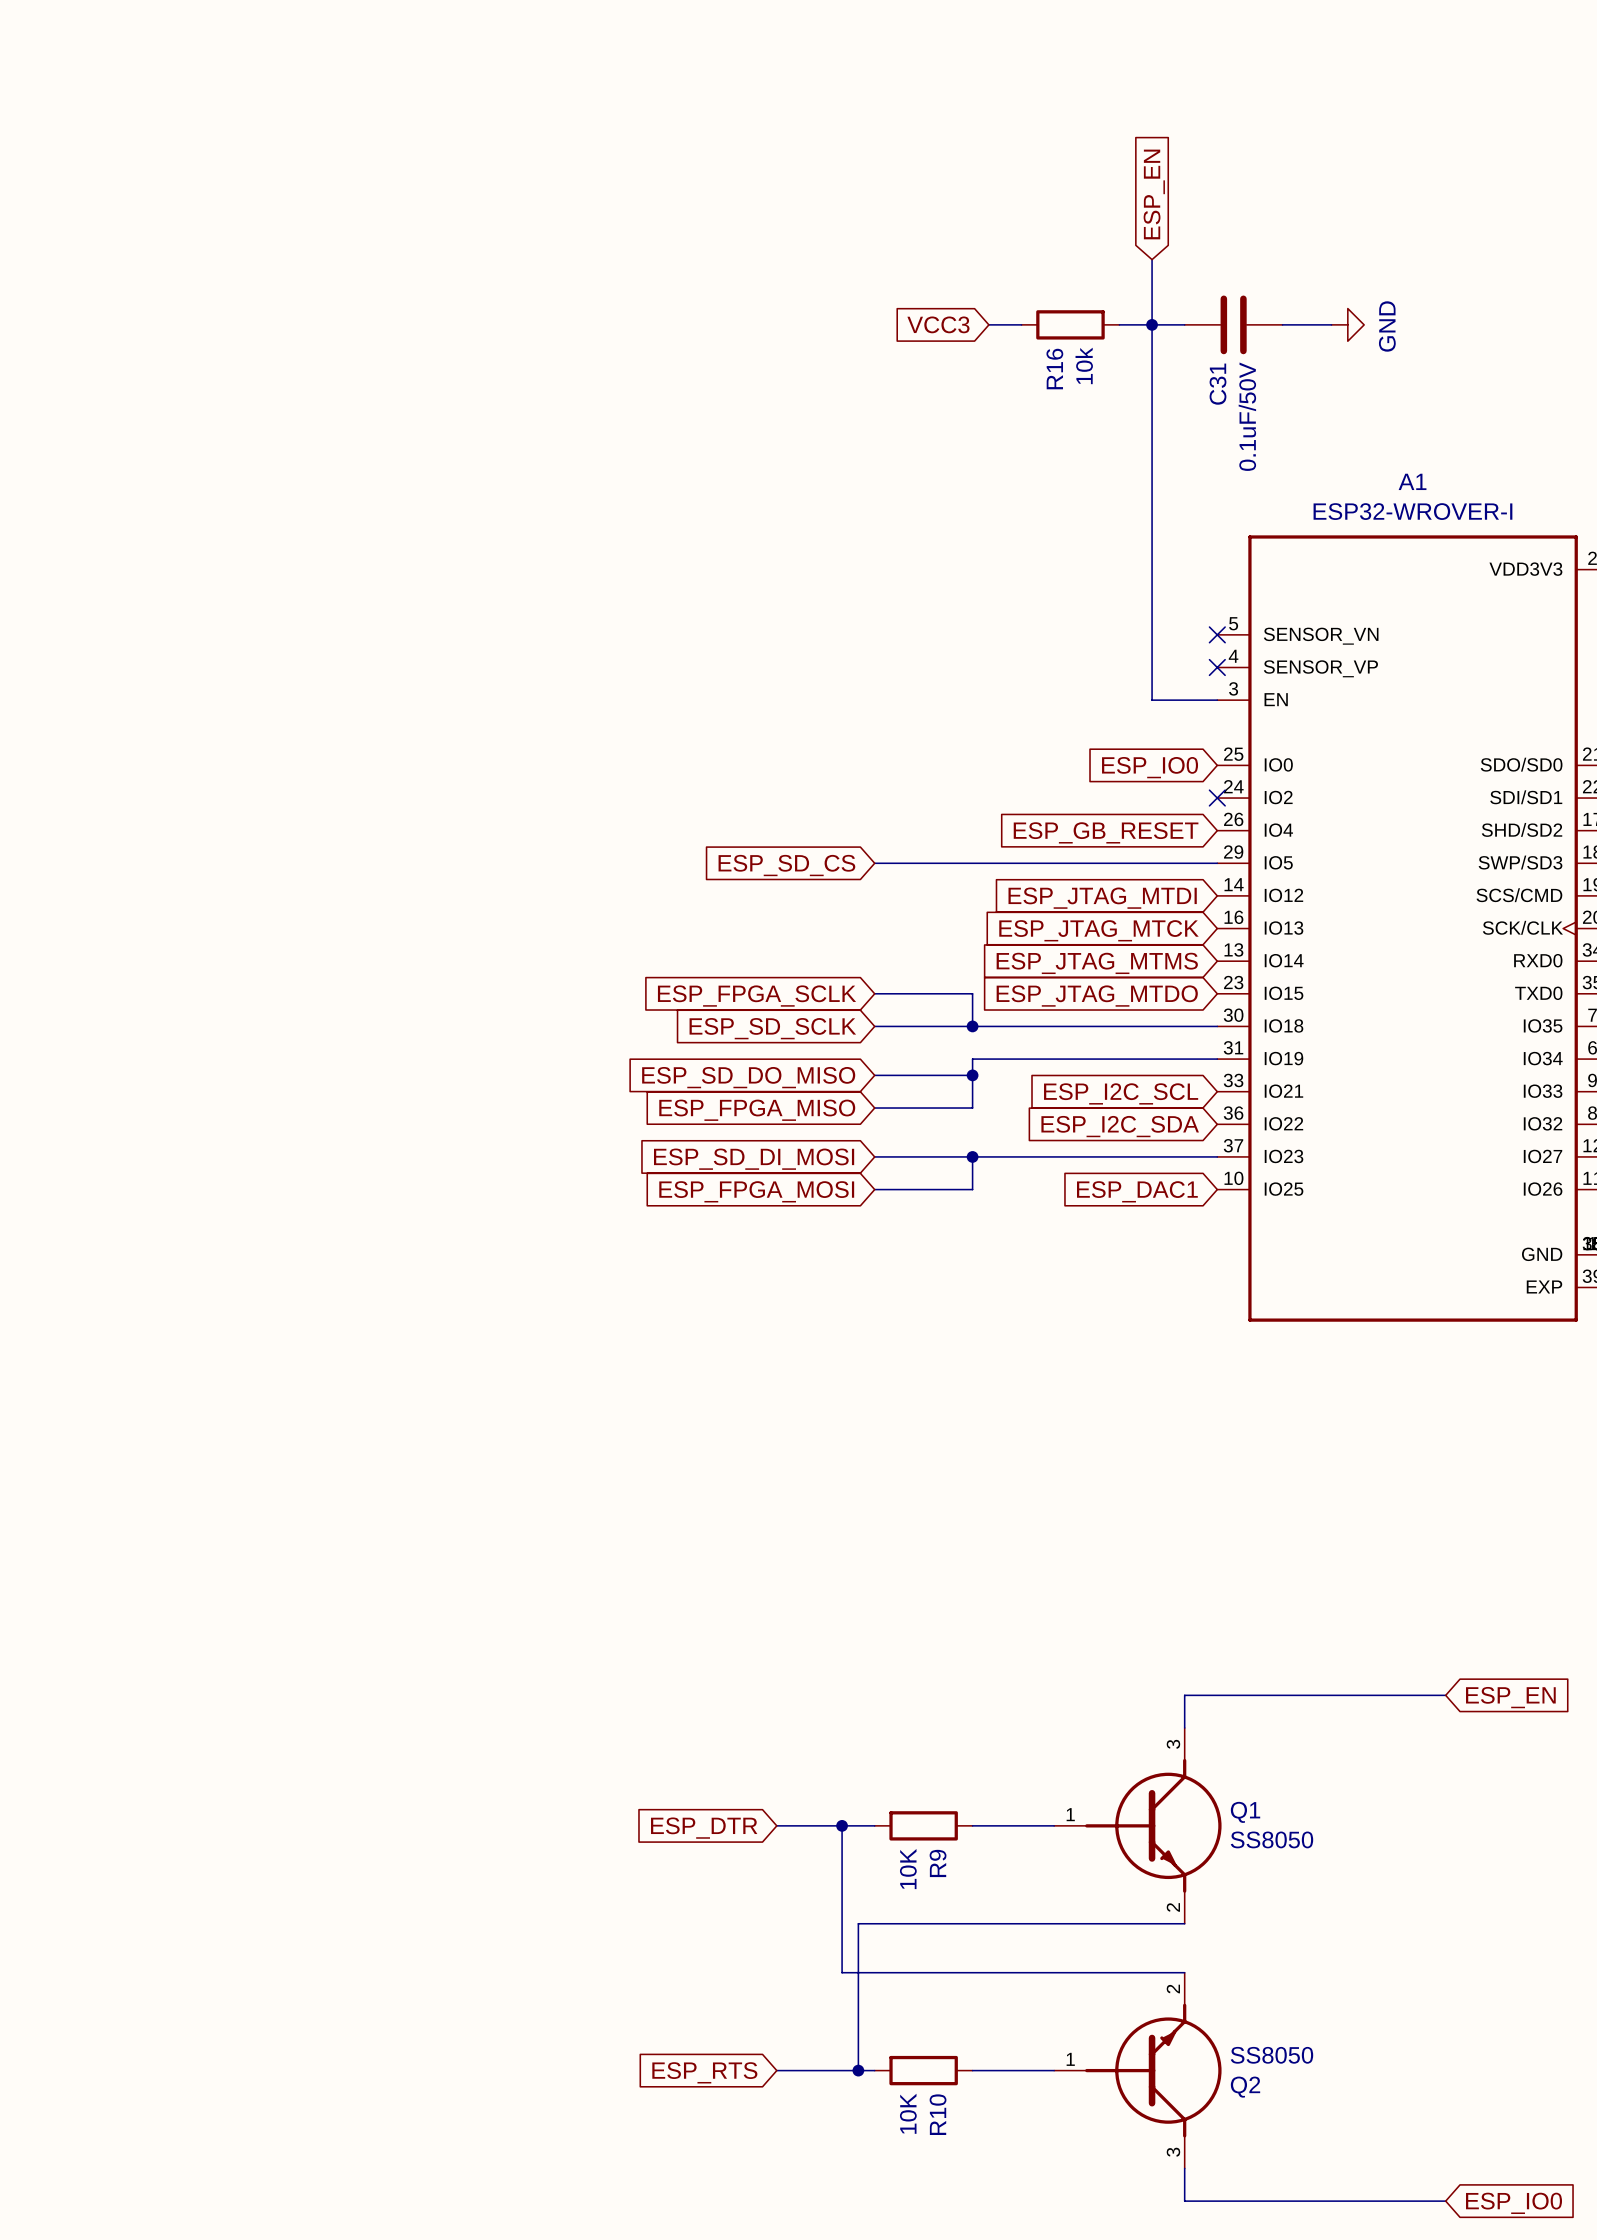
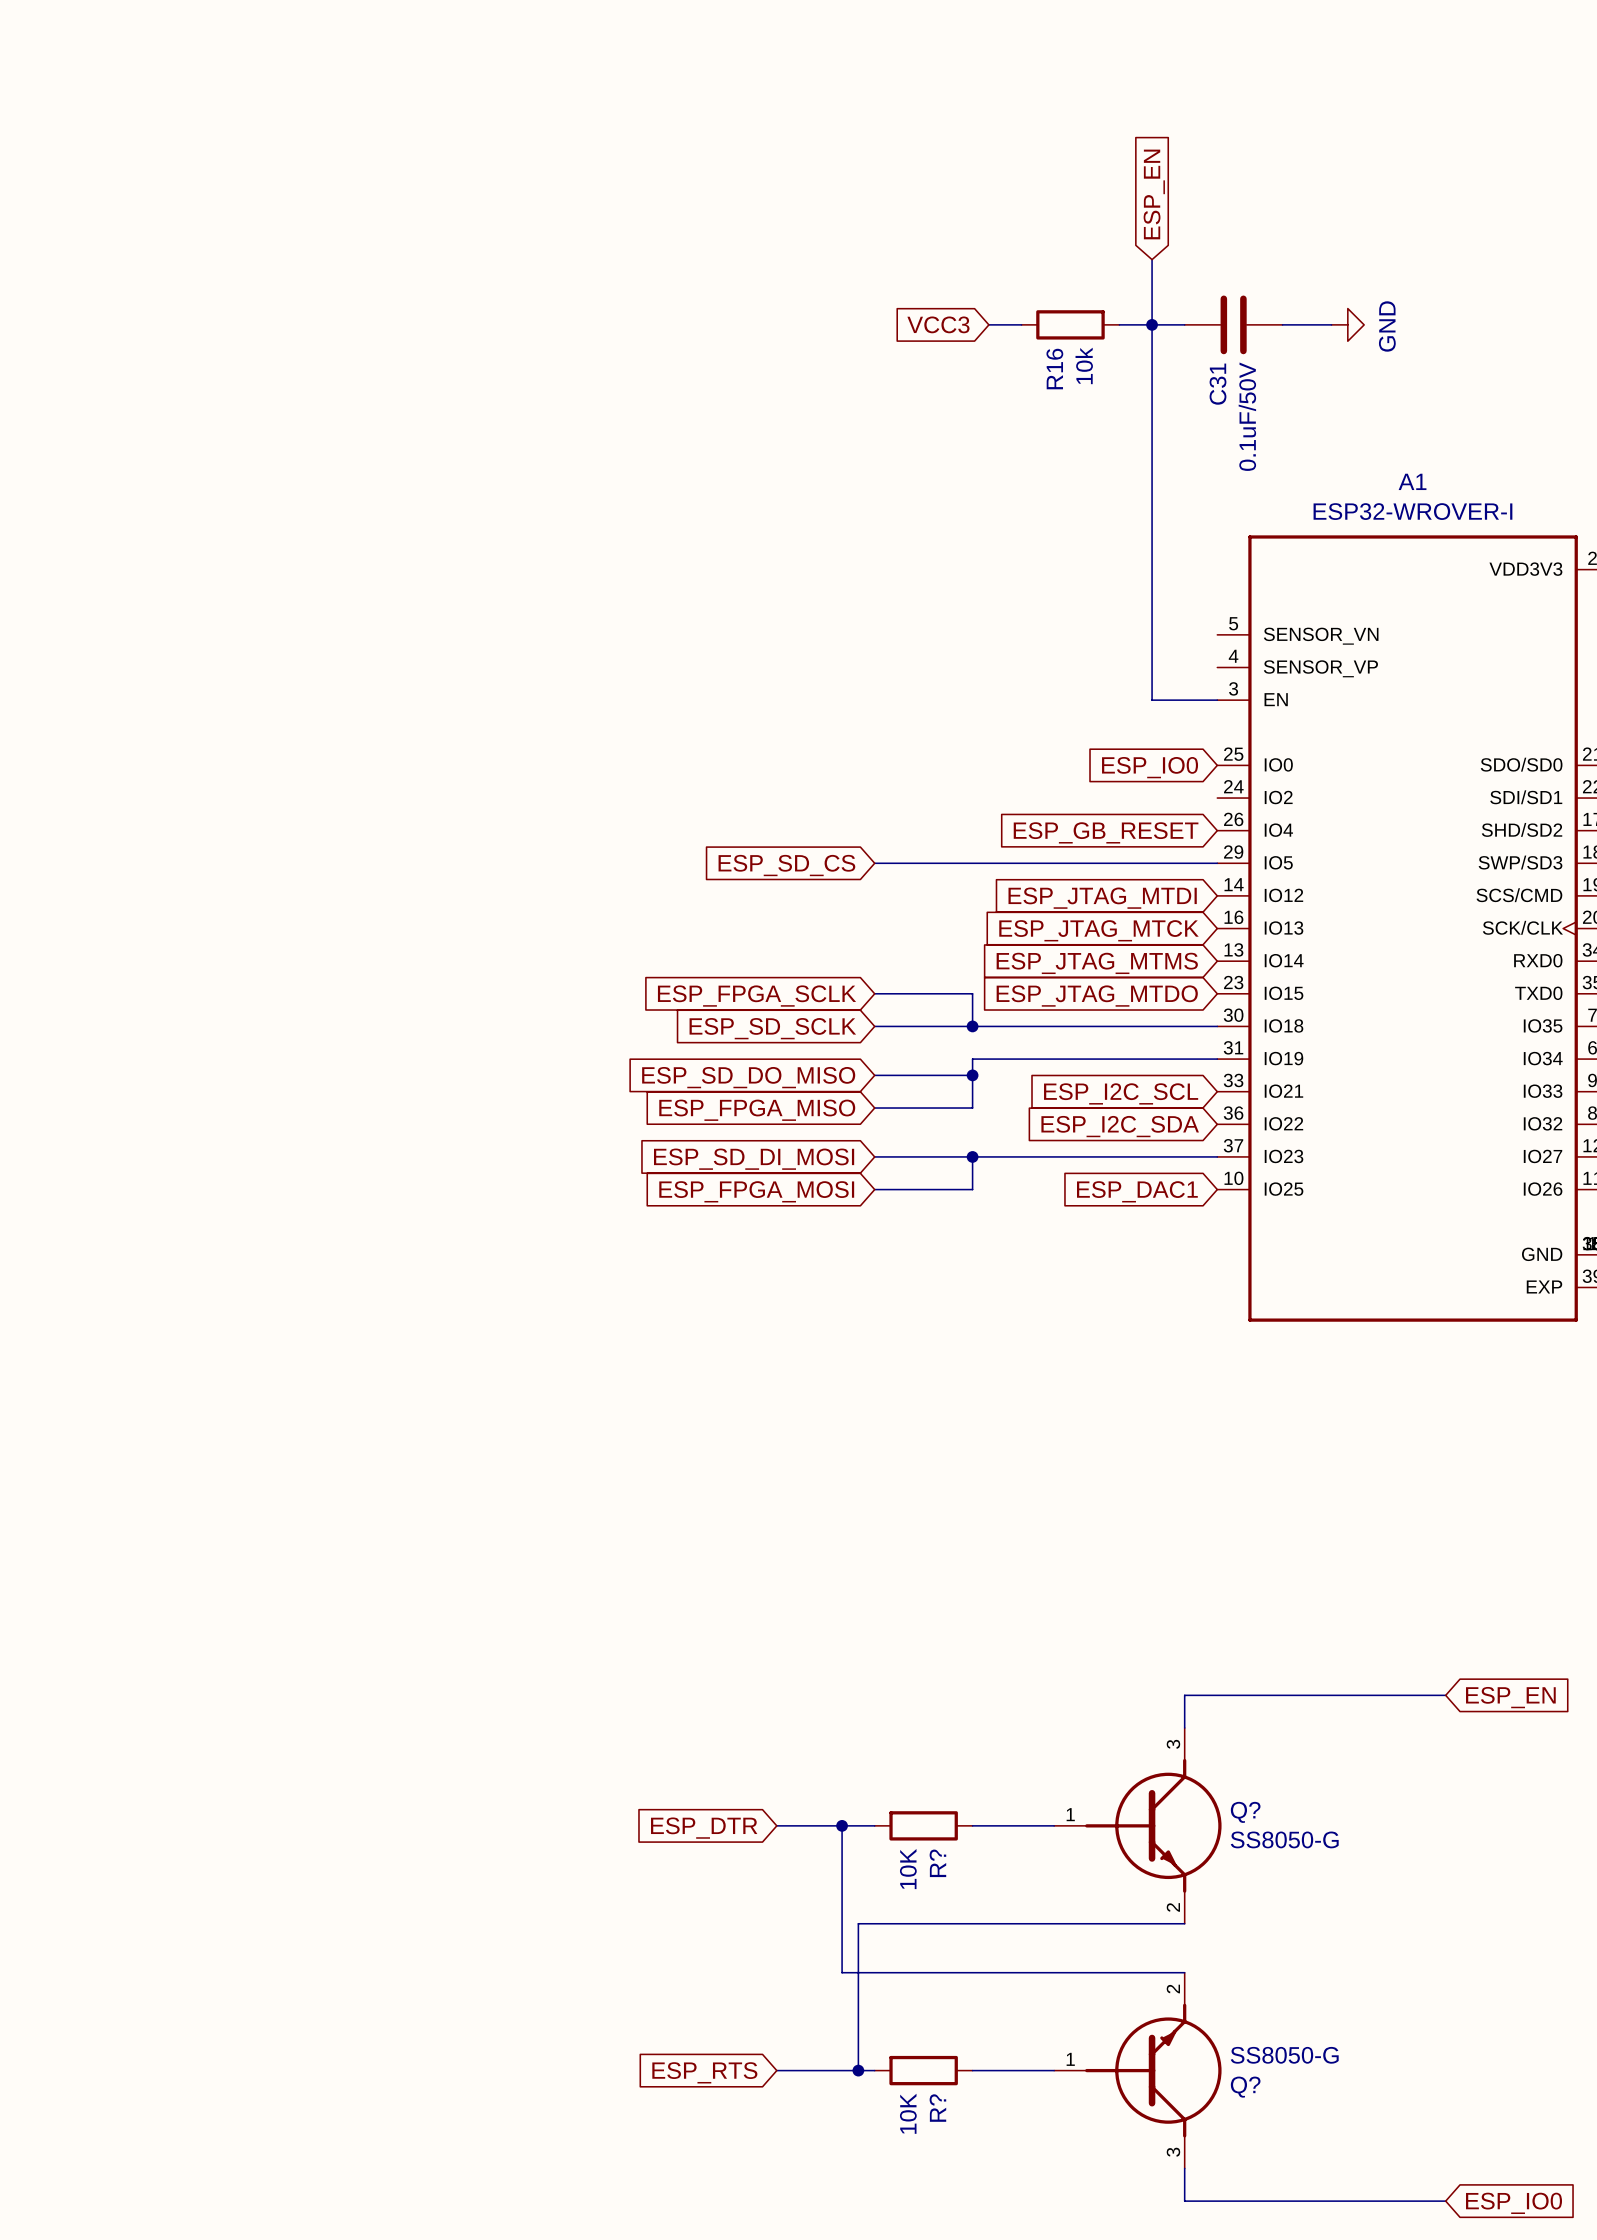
no-connect mark: (1217, 634) -> none
no-connect mark: (1217, 667) -> none
no-connect mark: (1217, 798) -> none
Q1 name: Q1 (1245, 1812) -> Q? (1245, 1812)
Q1 value: SS8050 (1271, 1839) -> SS8050-G (1284, 1839)
R9 name: R9 (938, 1863) -> R? (937, 1863)
Q2 value: SS8050 (1271, 2055) -> SS8050-G (1284, 2055)
Q2 name: Q2 (1245, 2087) -> Q? (1245, 2087)
R10 name: R10 (938, 2114) -> R? (937, 2108)

